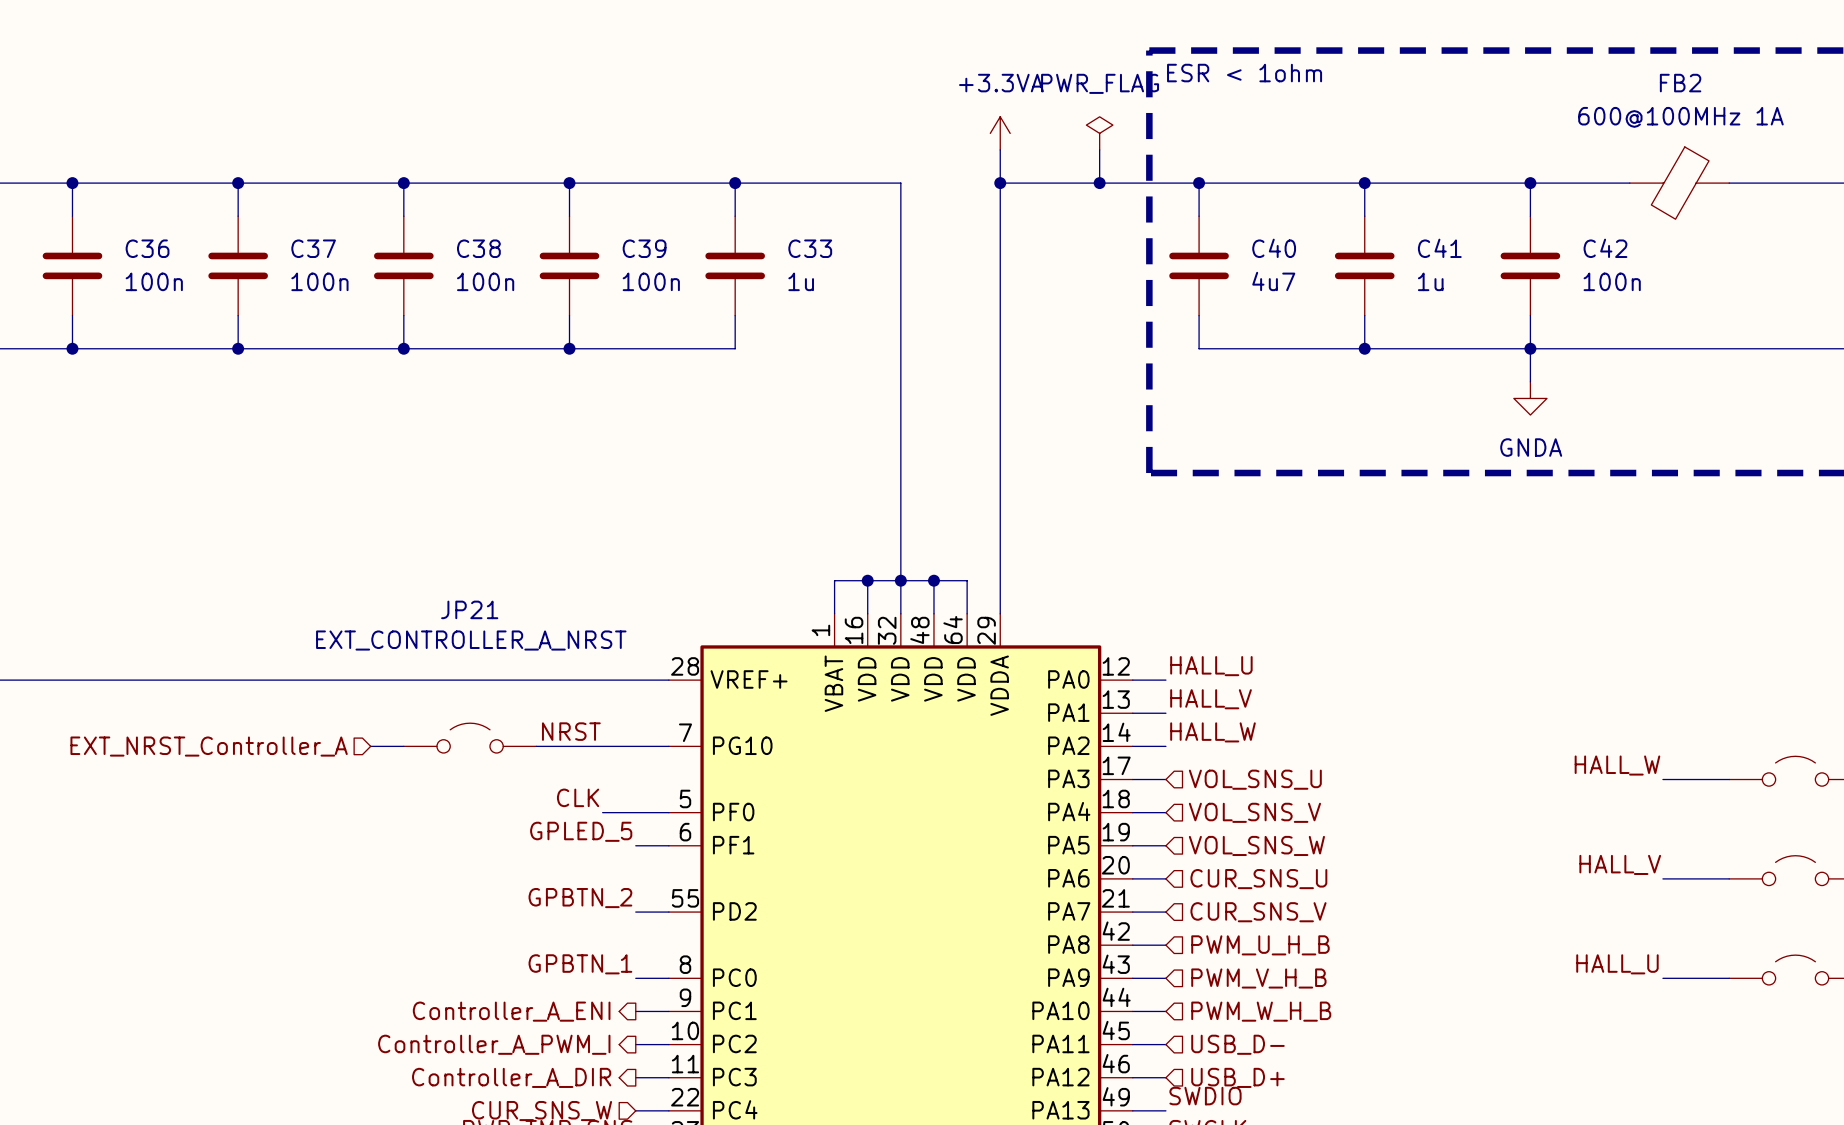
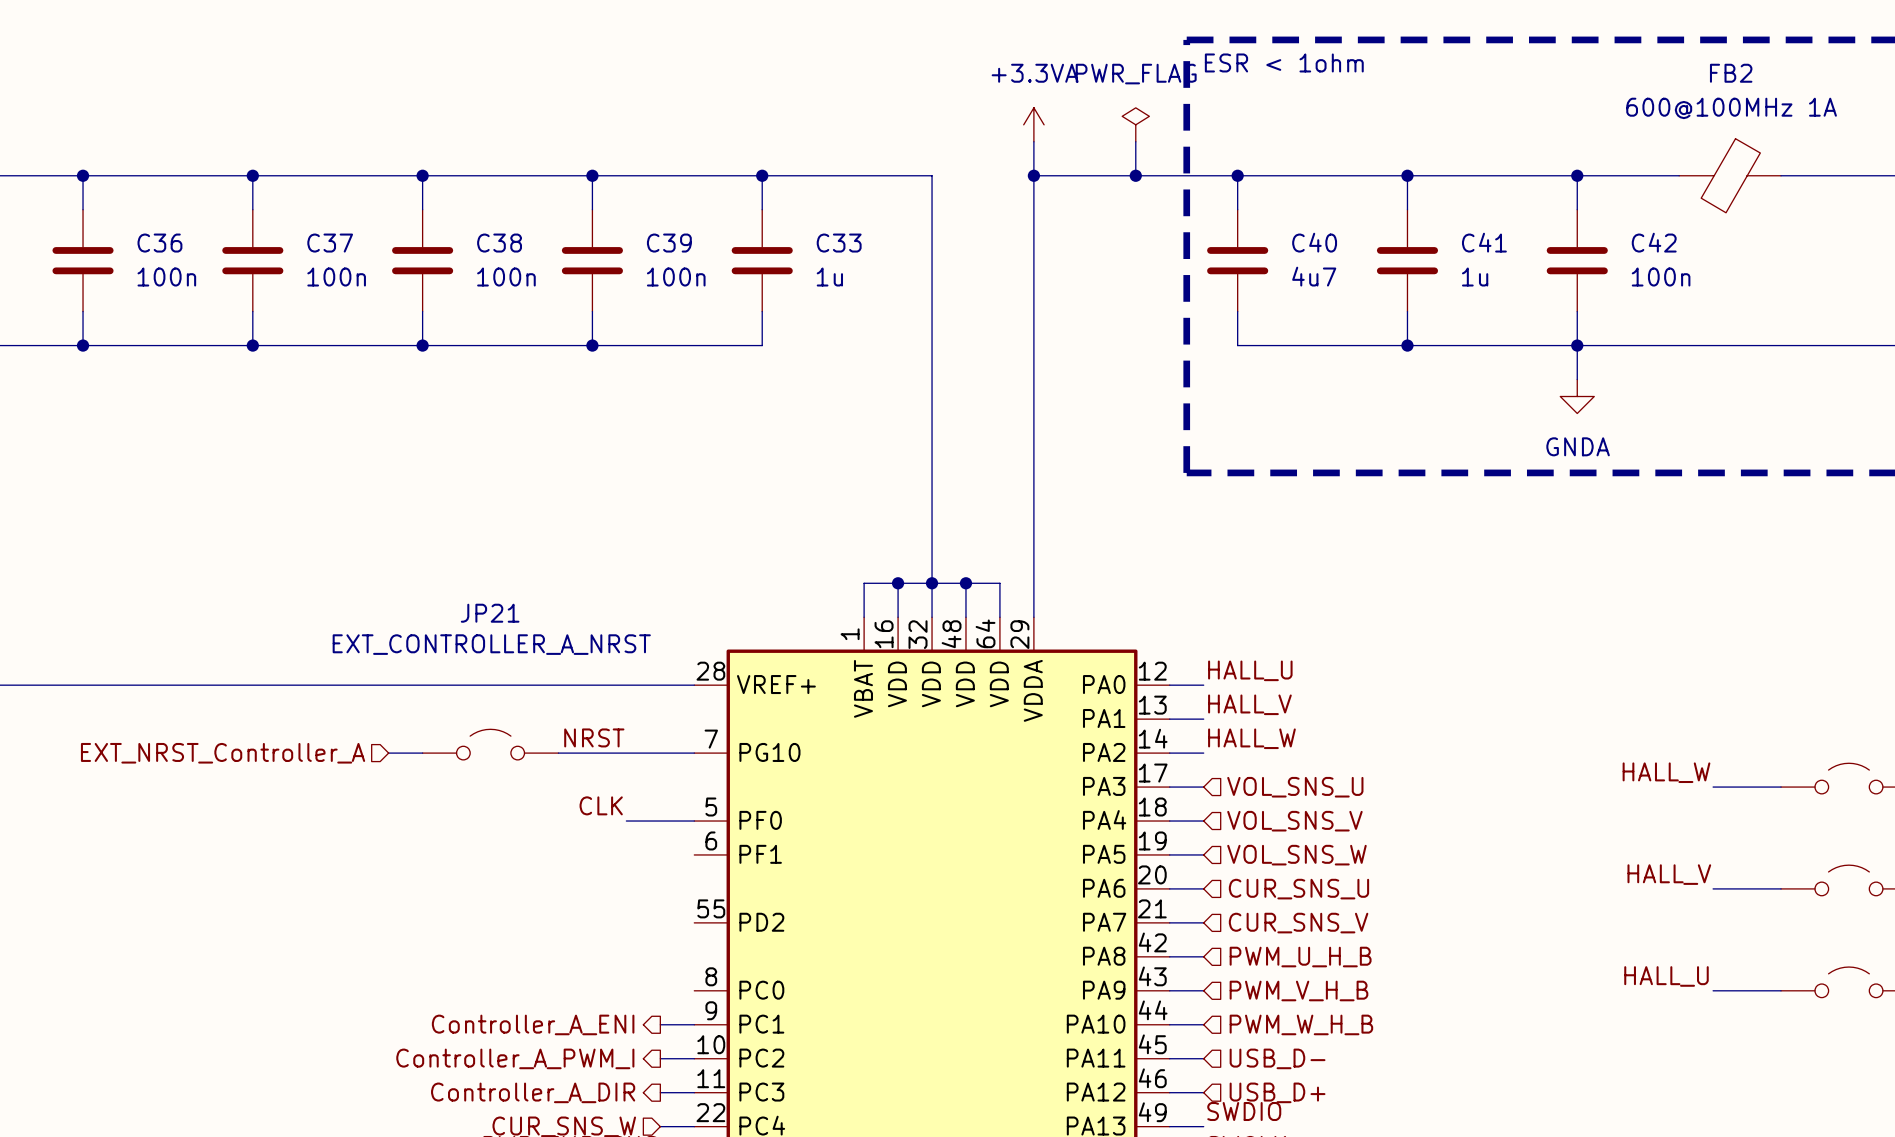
label: GPLED_5 (581, 831) -> none
wire: (635, 845) (668, 845) -> none
label: GPBTN_2 (580, 898) -> none
wire: (635, 912) (668, 912) -> none
label: GPBTN_1 (580, 964) -> none
wire: (635, 978) (668, 978) -> none

